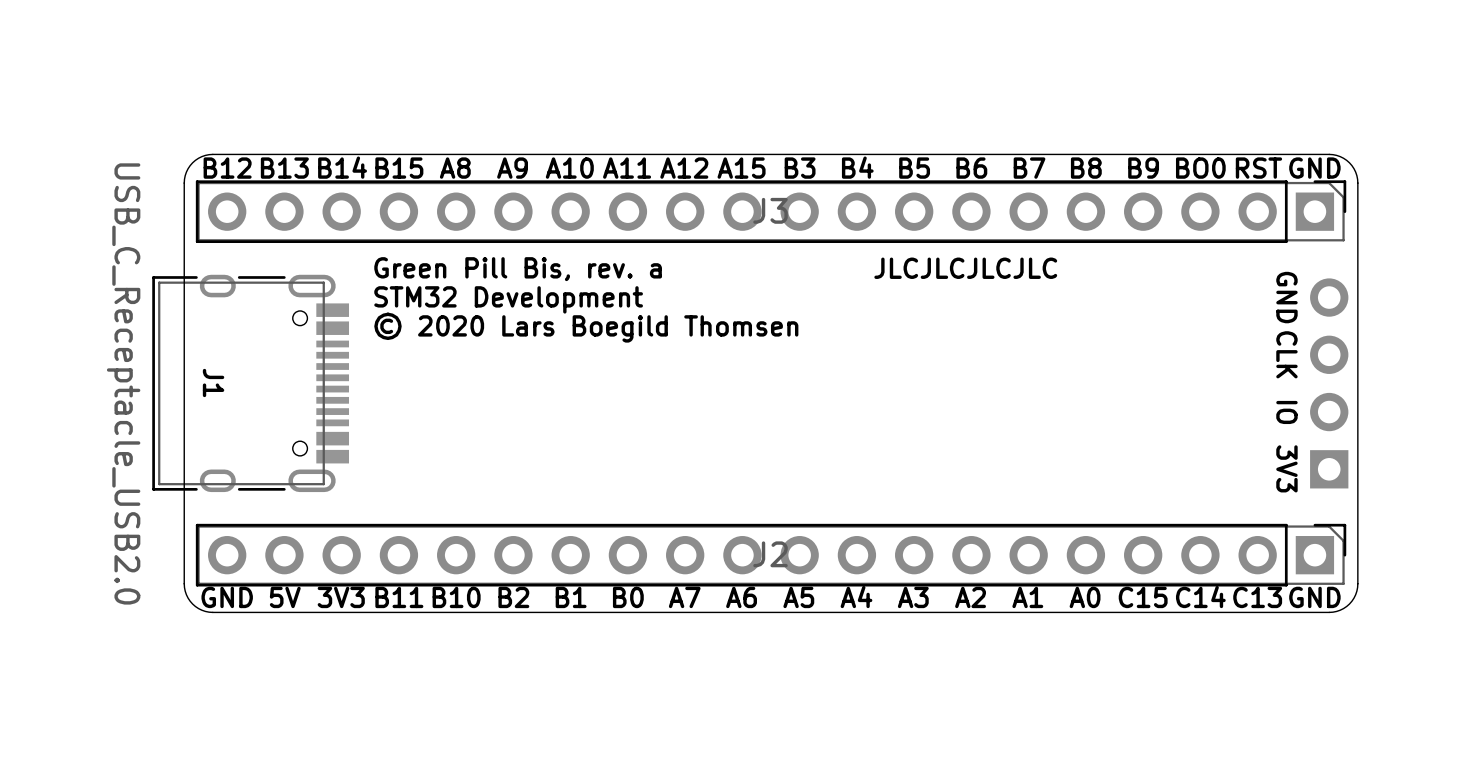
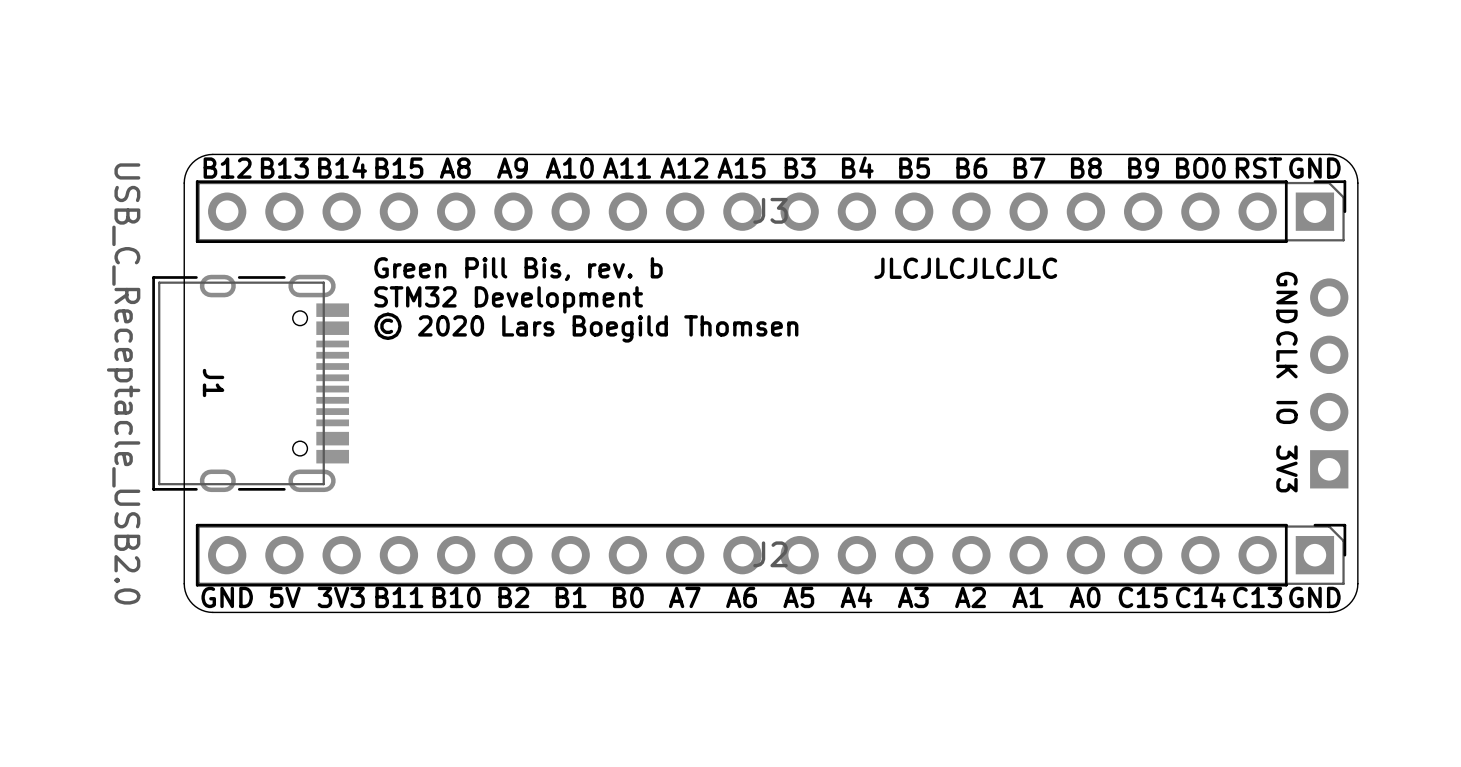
text: Green Pill Bis, rev. a (518, 269) -> Green Pill Bis, rev. b (518, 269)

